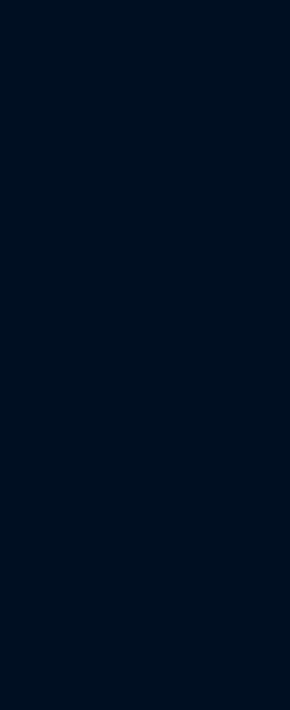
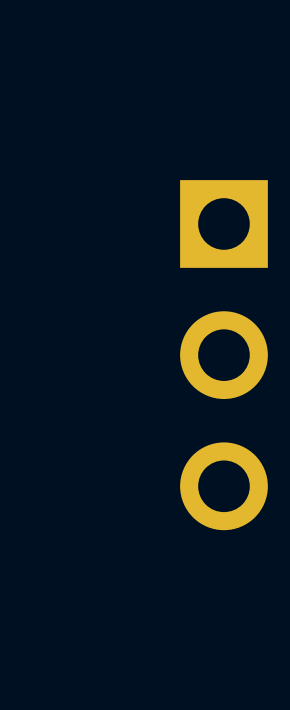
part: none -> (223, 355)

